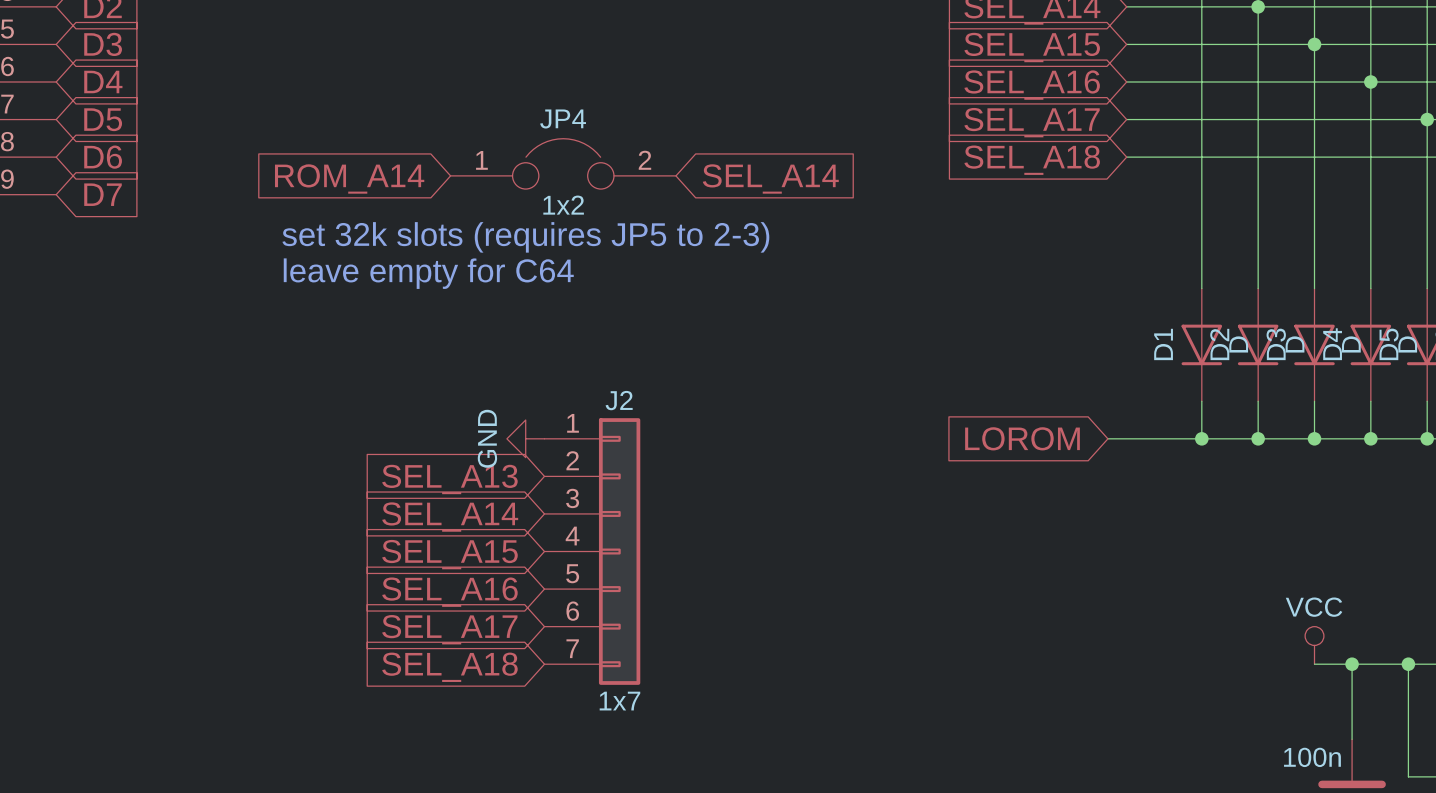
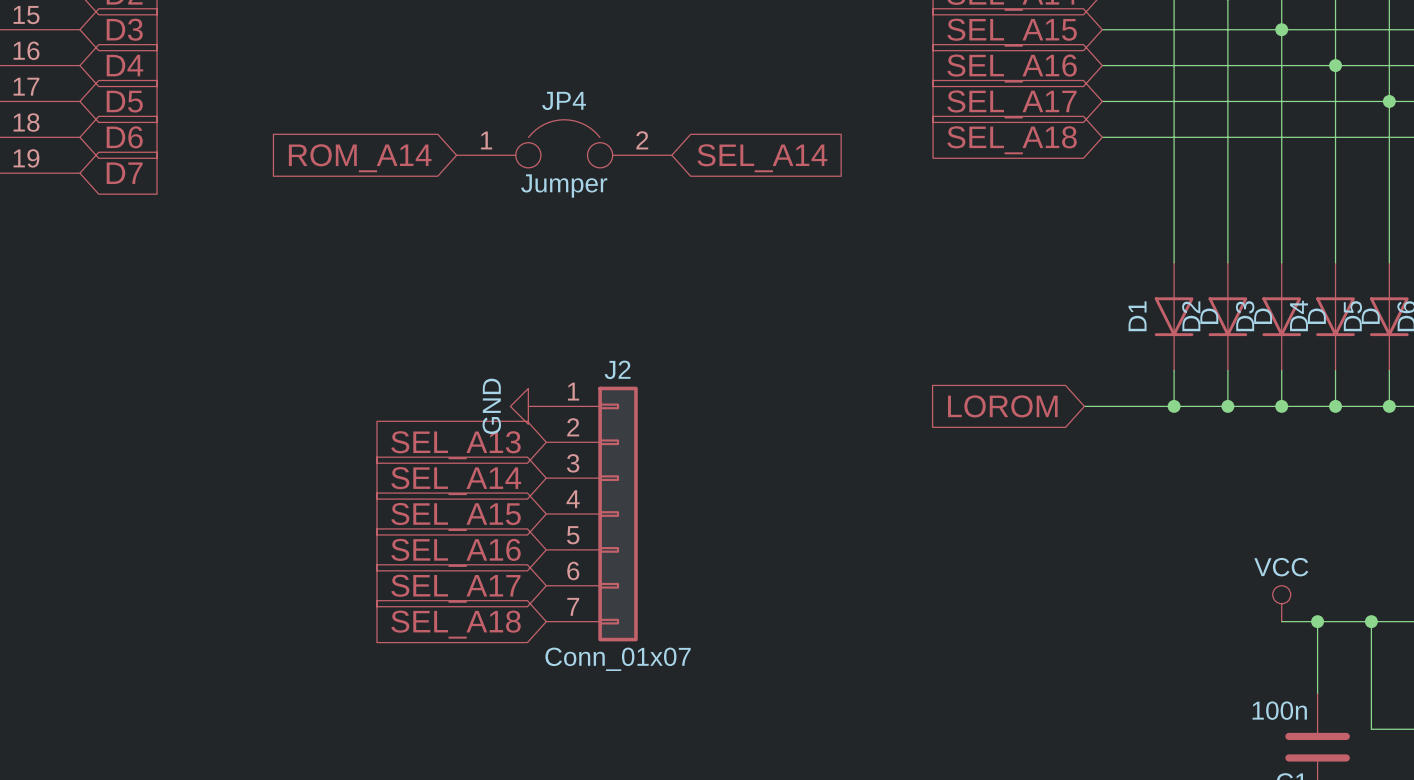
JP4 value: 1x2 (563, 205) -> Jumper (564, 186)
text: set 32k slots (requires JP5 to 2-3) (525, 237) -> none
text: leave empty for C64 (428, 273) -> none
J2 value: 1x7 (619, 701) -> Conn_01x07 (618, 659)

